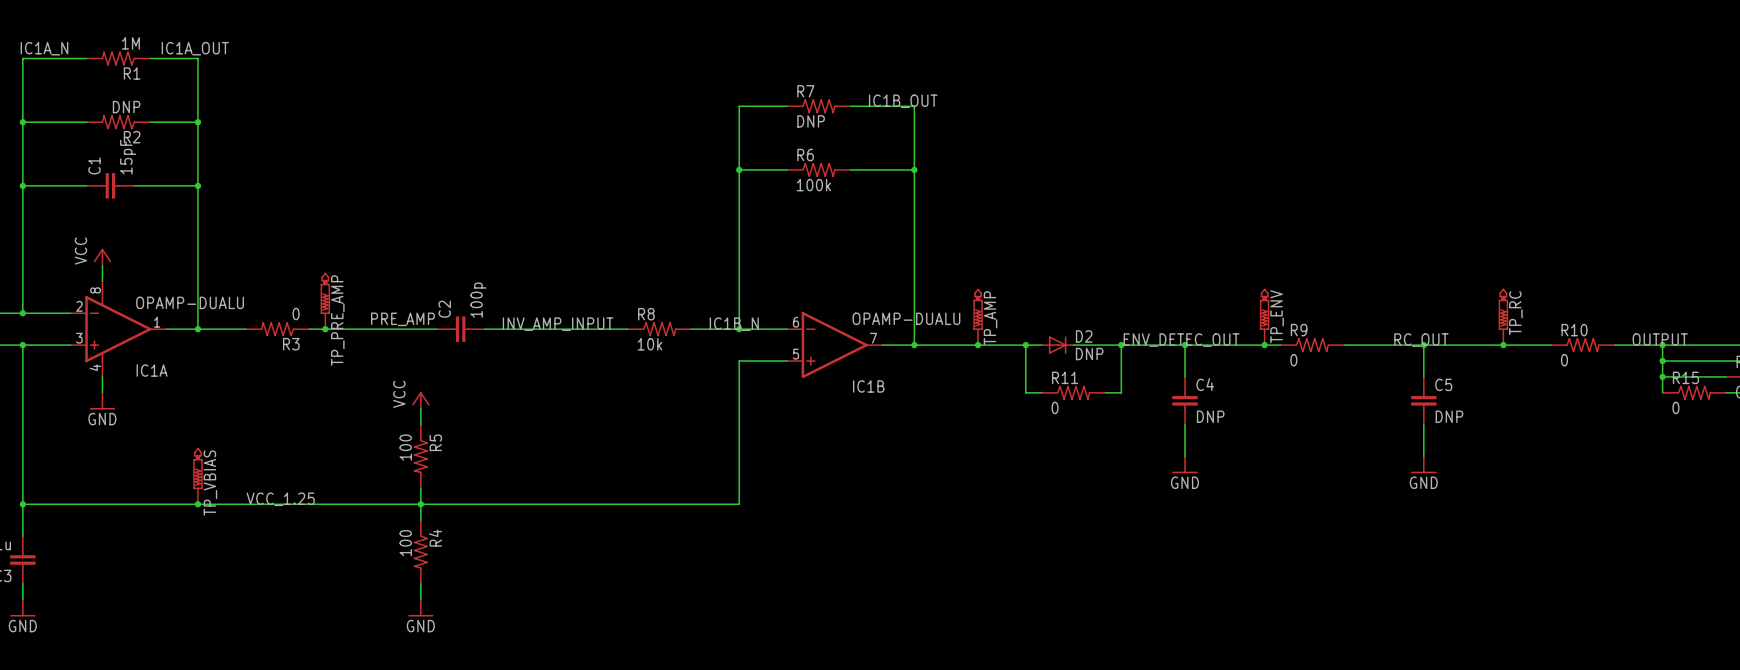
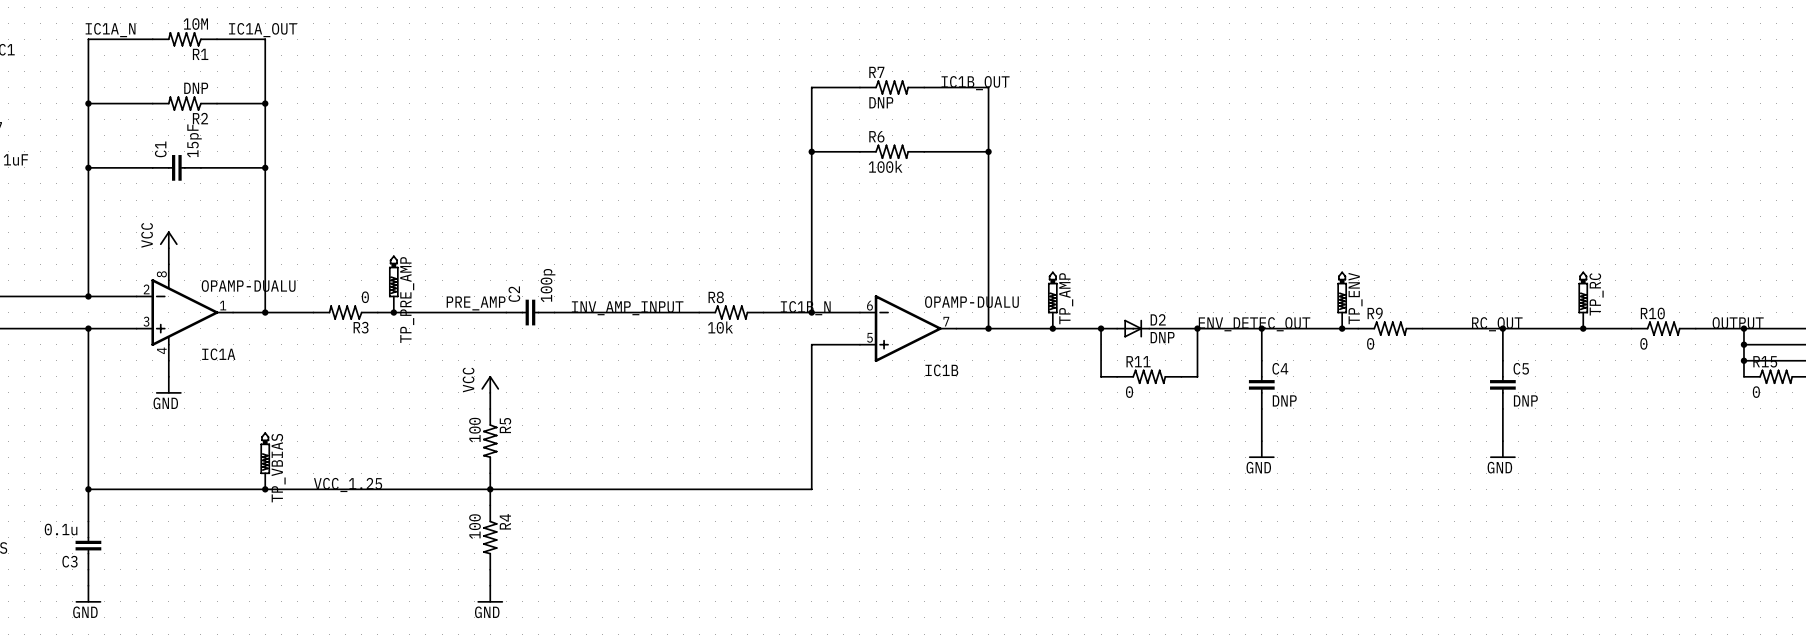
R1 value: 1M (130, 43) -> 10M (195, 24)

